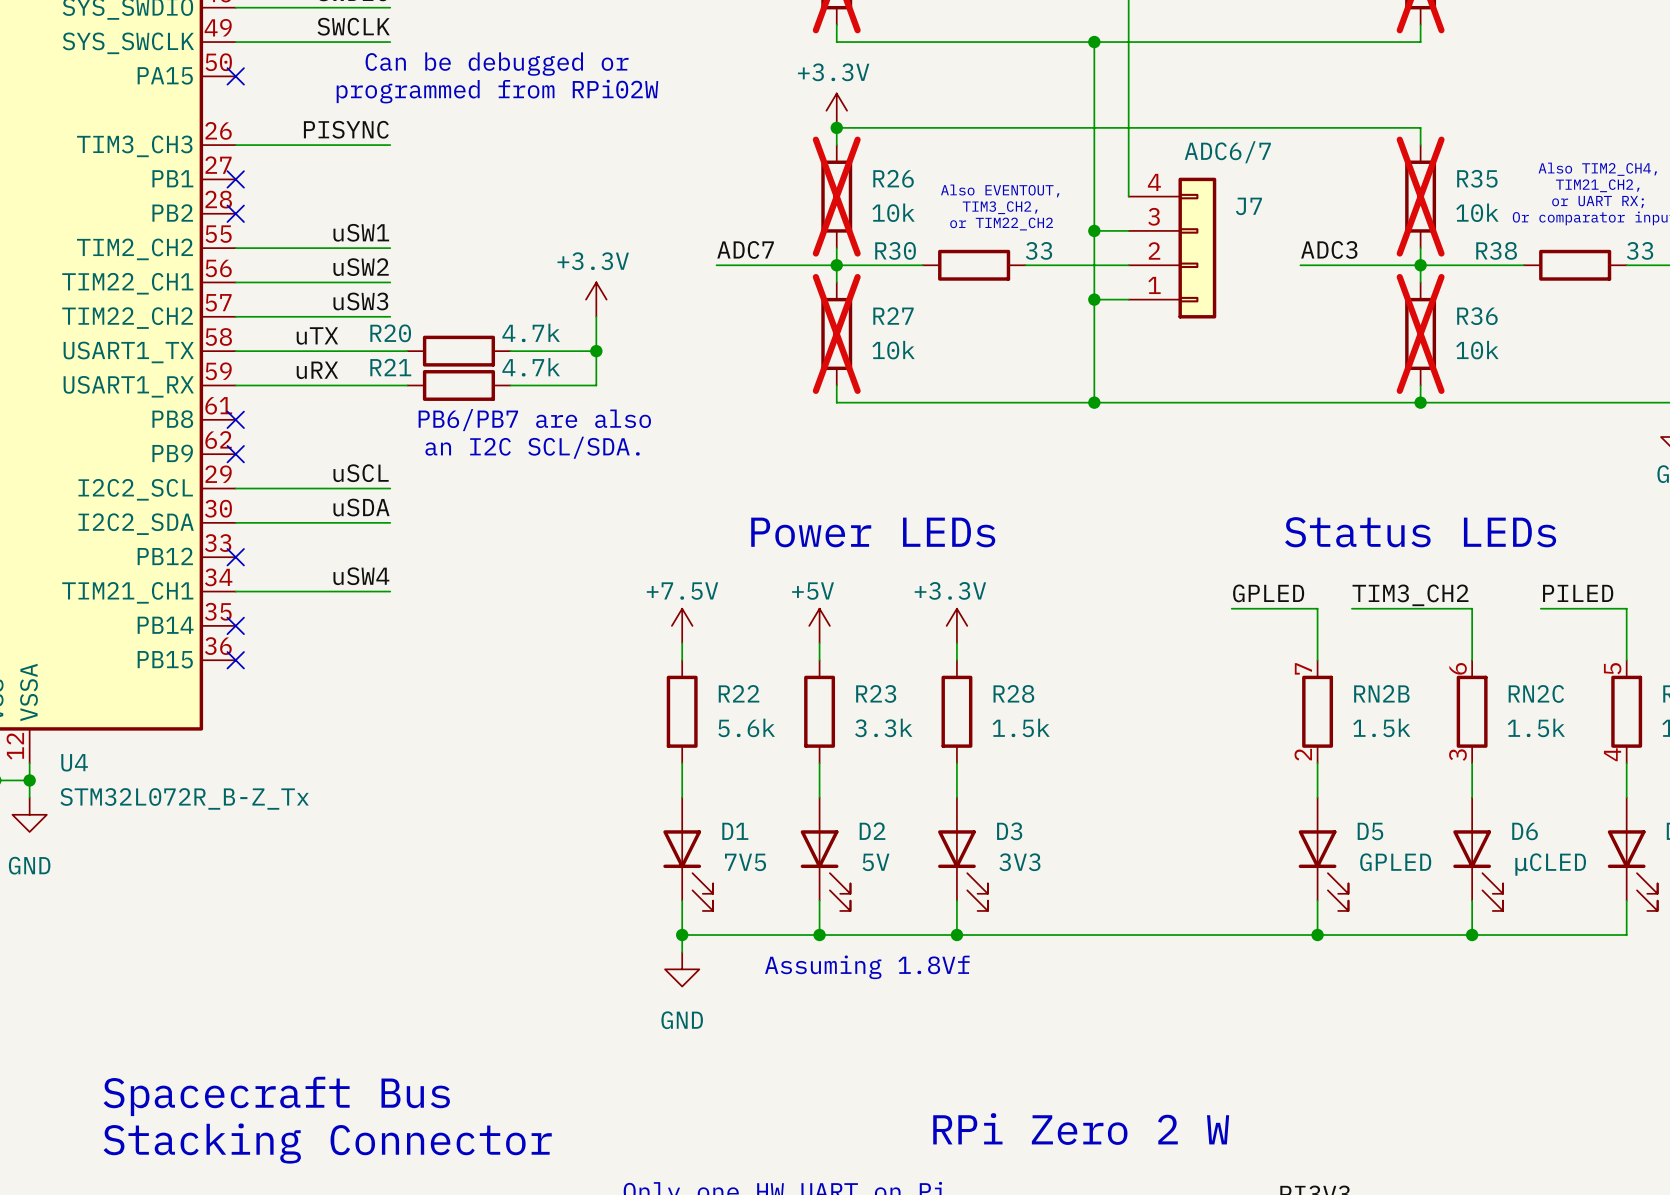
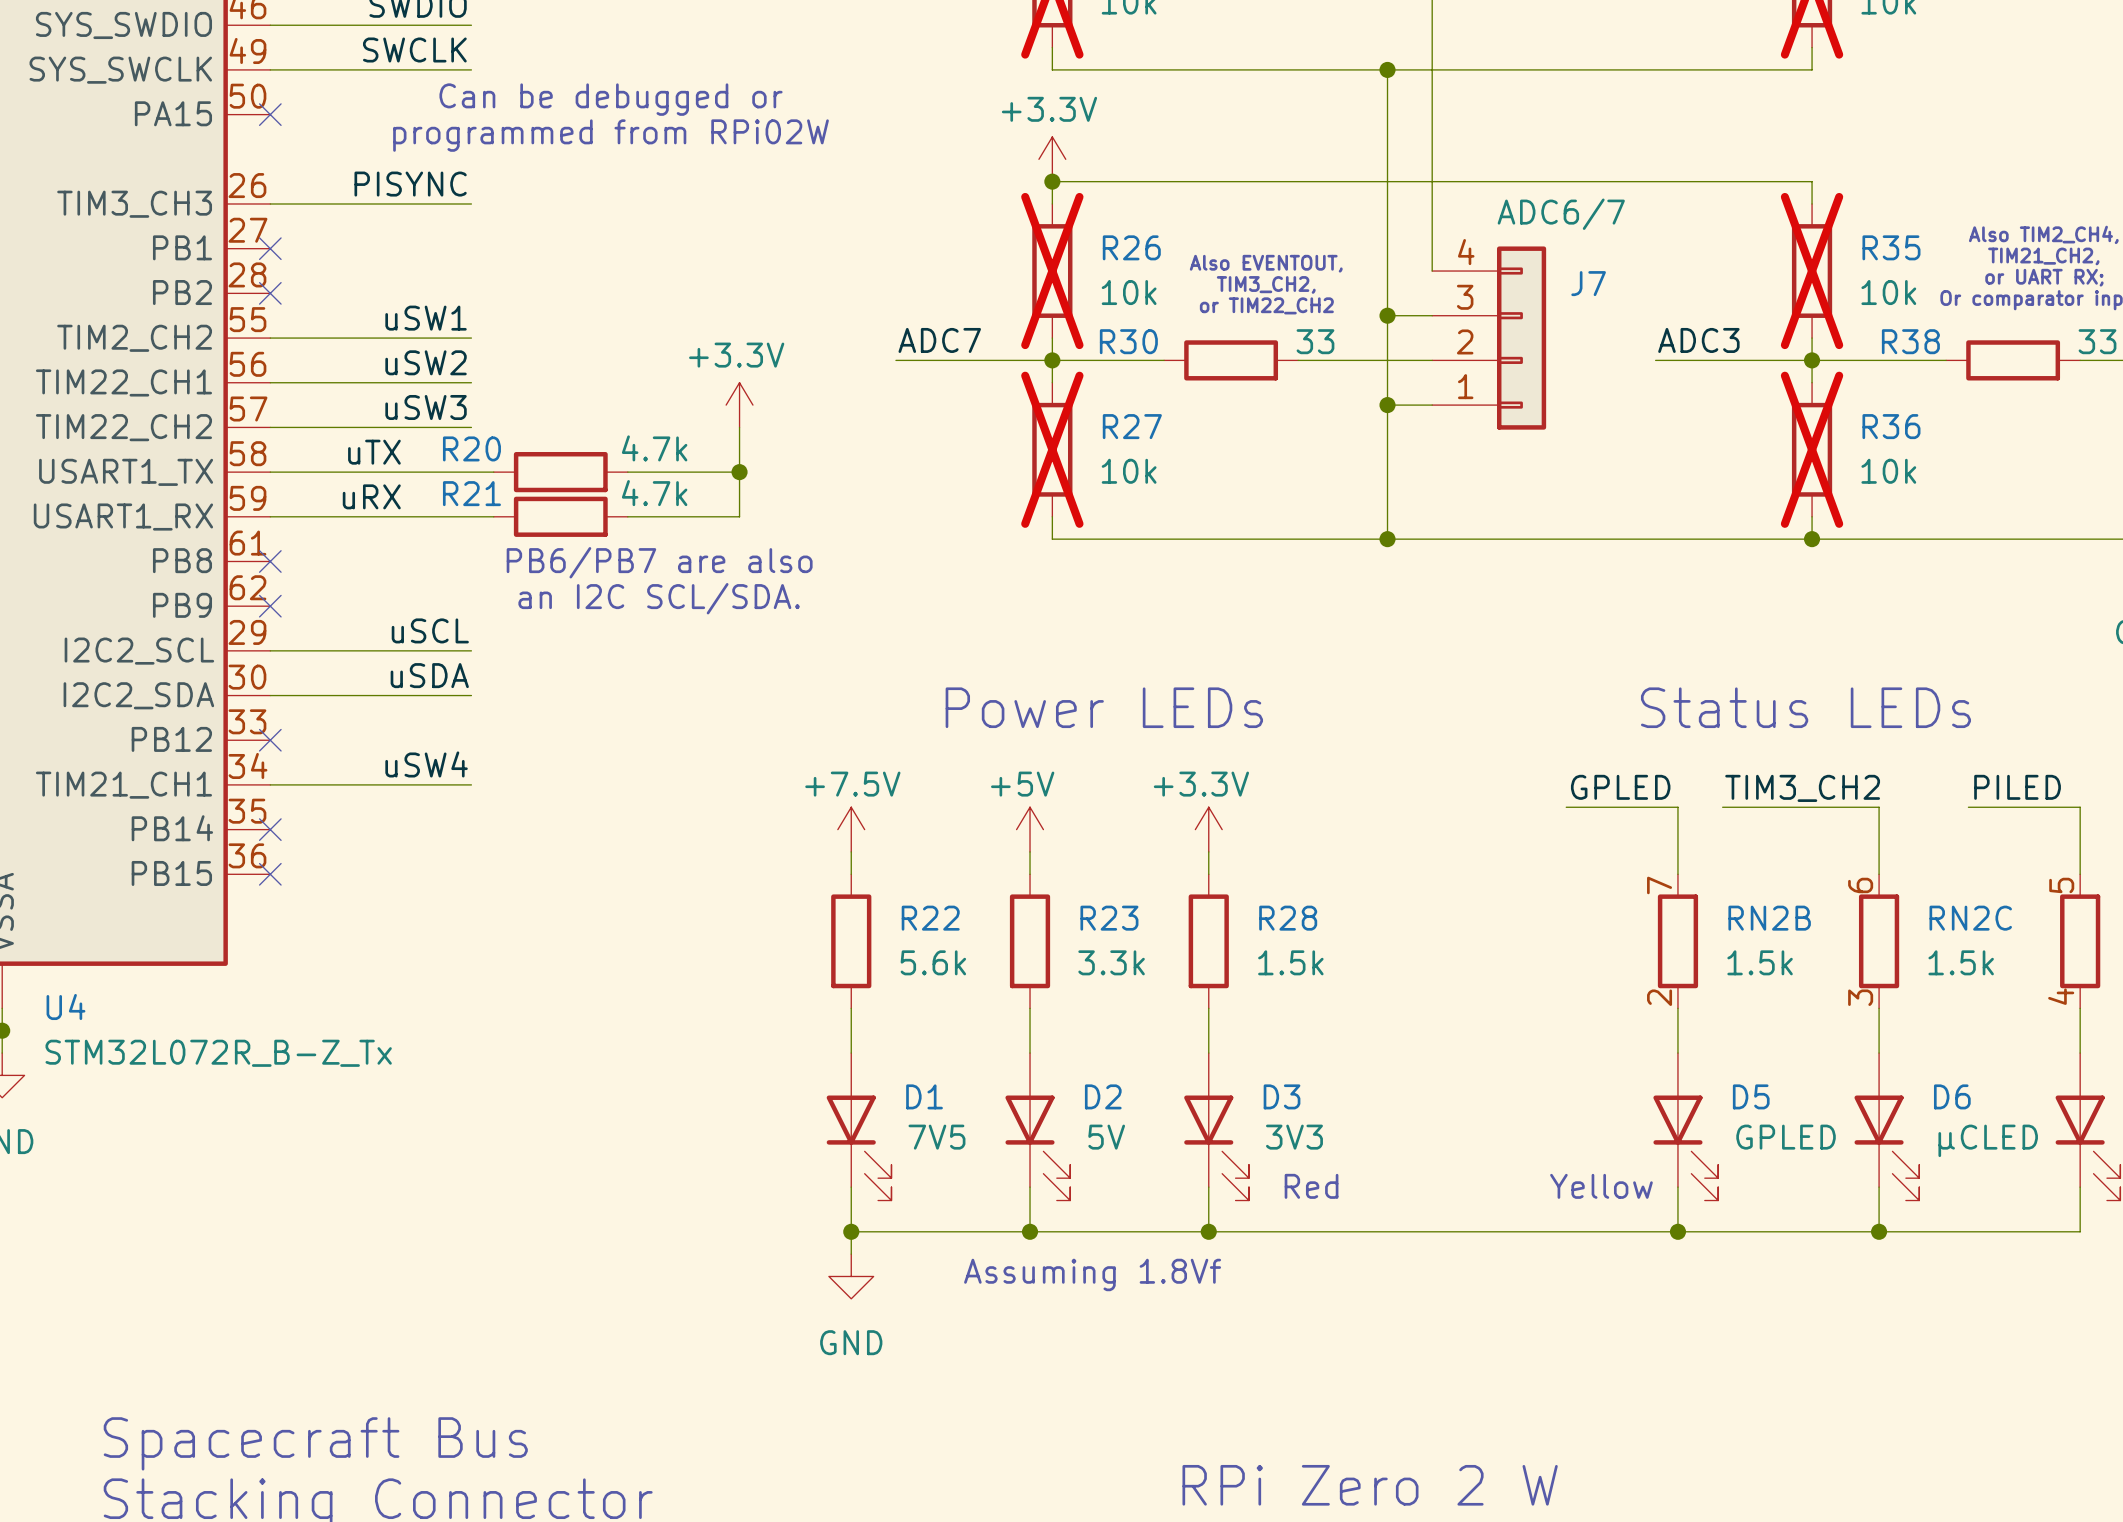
text: none -> Red (1311, 1186)
text: none -> Yellow (1601, 1186)

